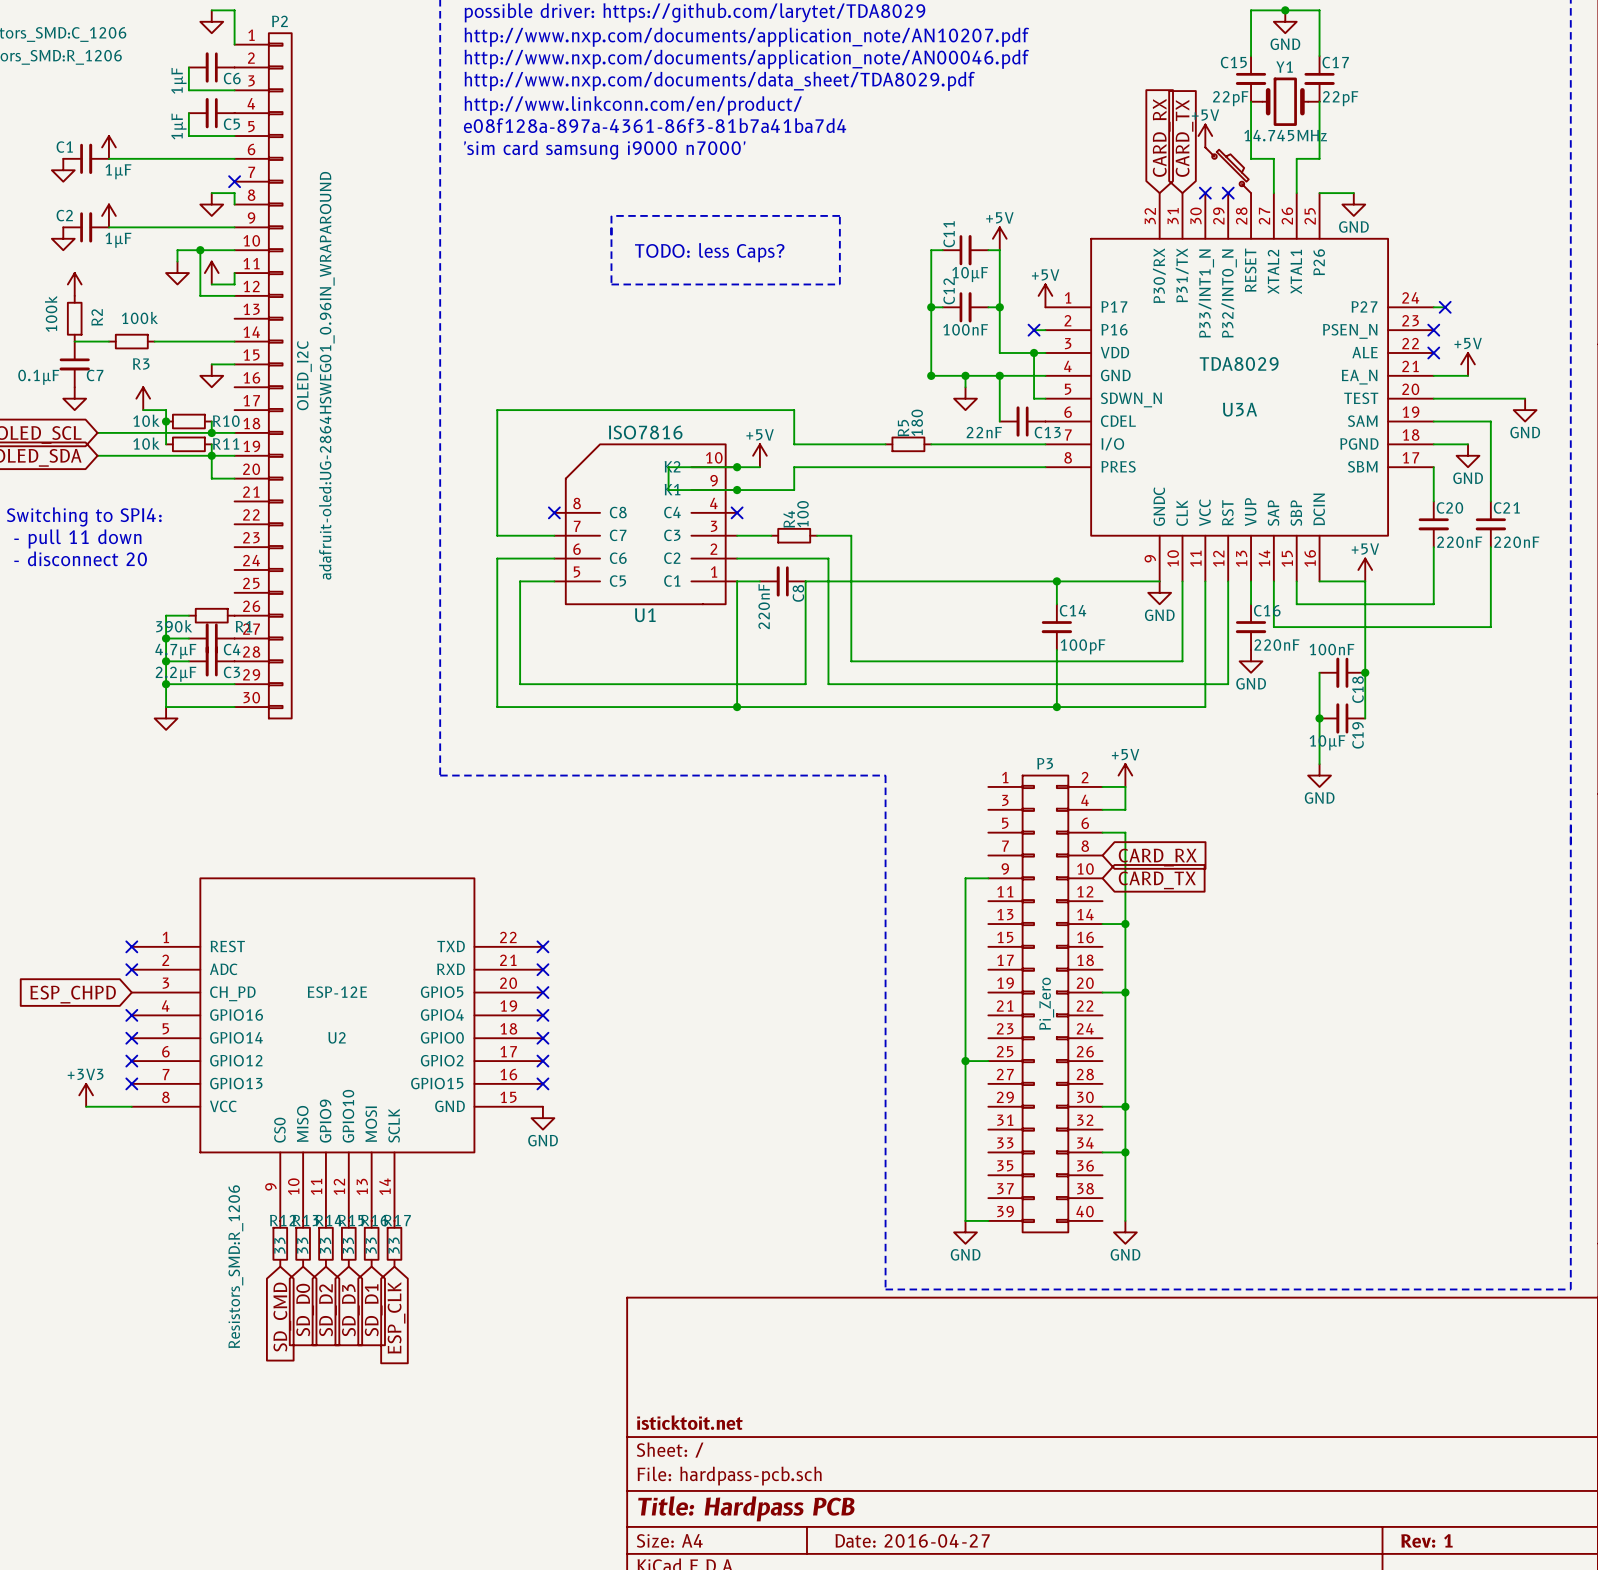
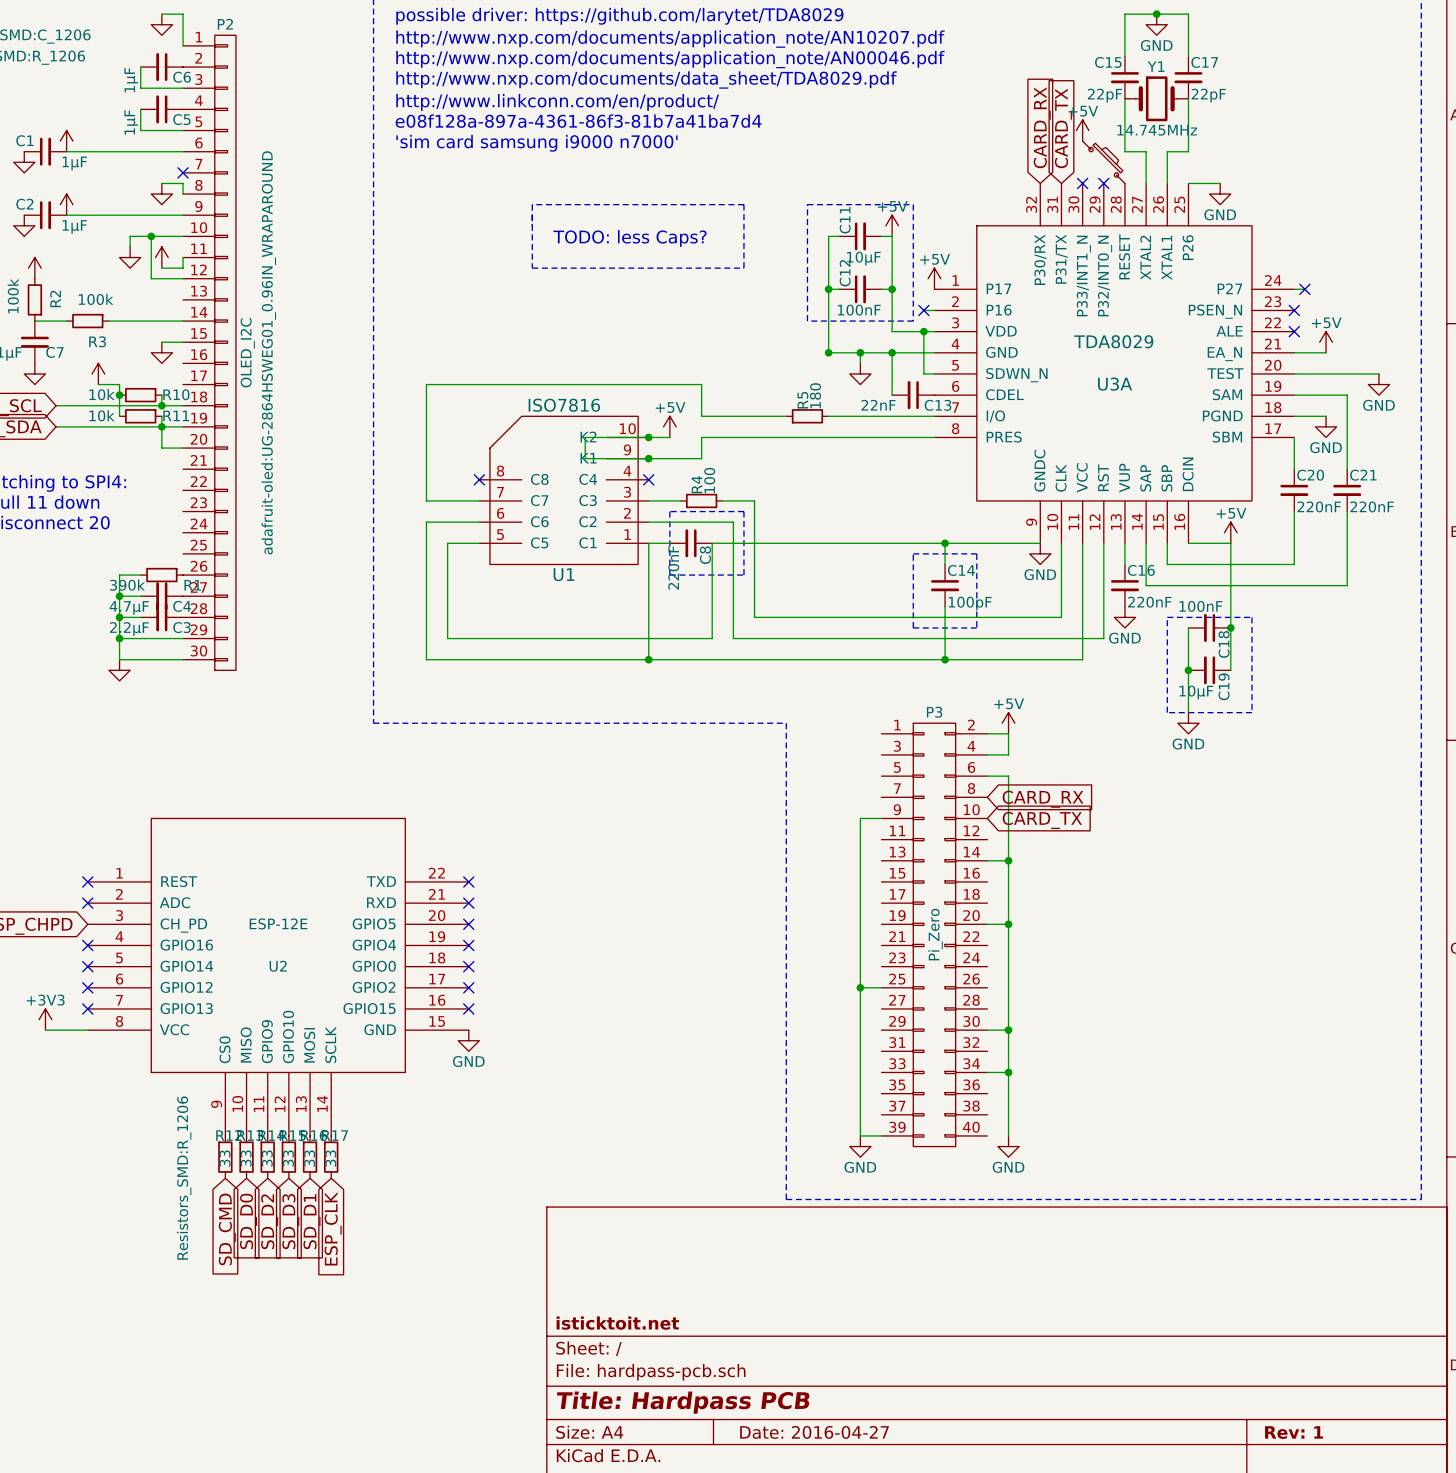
line: none -> (807, 204) (913, 204) (913, 321) (807, 321) (807, 204)
line: none -> (669, 511) (743, 511) (743, 575) (669, 575) (669, 511)
line: none -> (913, 553) (913, 627) (976, 627) (976, 553) (913, 553)
line: none -> (1167, 617) (1251, 617) (1251, 712) (1167, 712) (1167, 617)

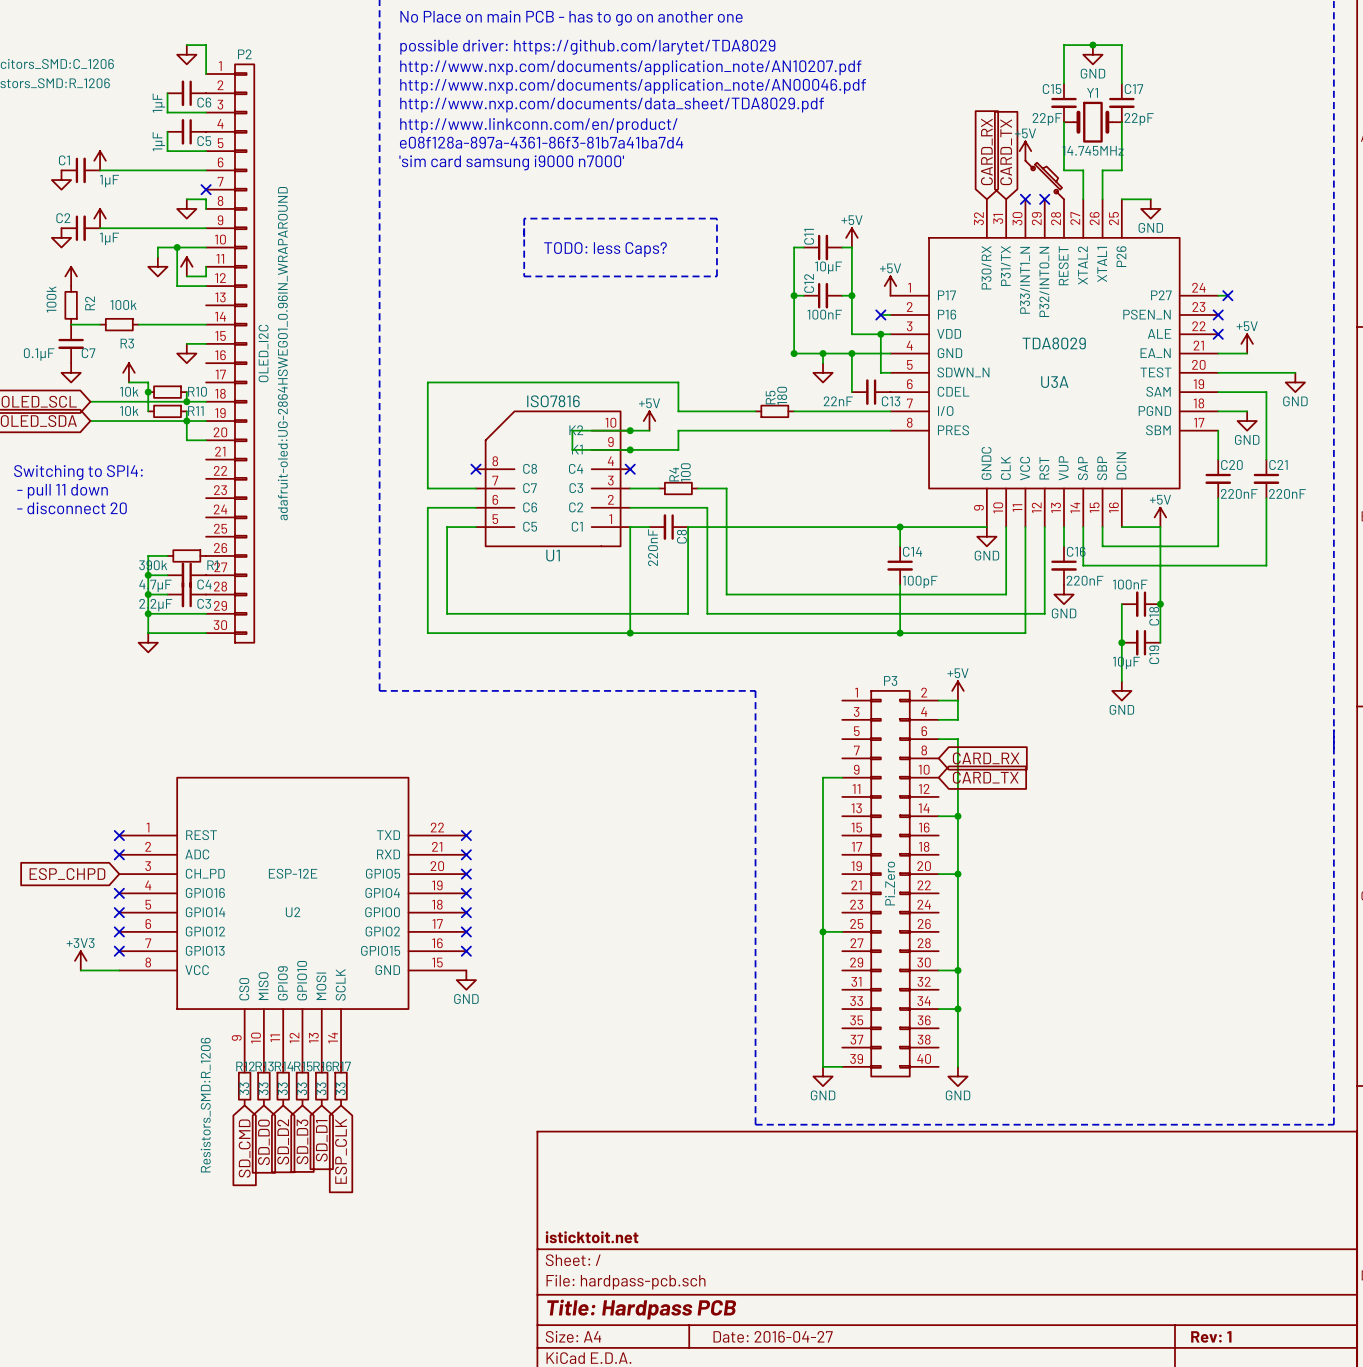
line: (807, 204) (913, 204) (913, 321) (807, 321) (807, 204) -> none
line: (669, 511) (743, 511) (743, 575) (669, 575) (669, 511) -> none
line: (913, 553) (913, 627) (976, 627) (976, 553) (913, 553) -> none
line: (1167, 617) (1251, 617) (1251, 712) (1167, 712) (1167, 617) -> none

